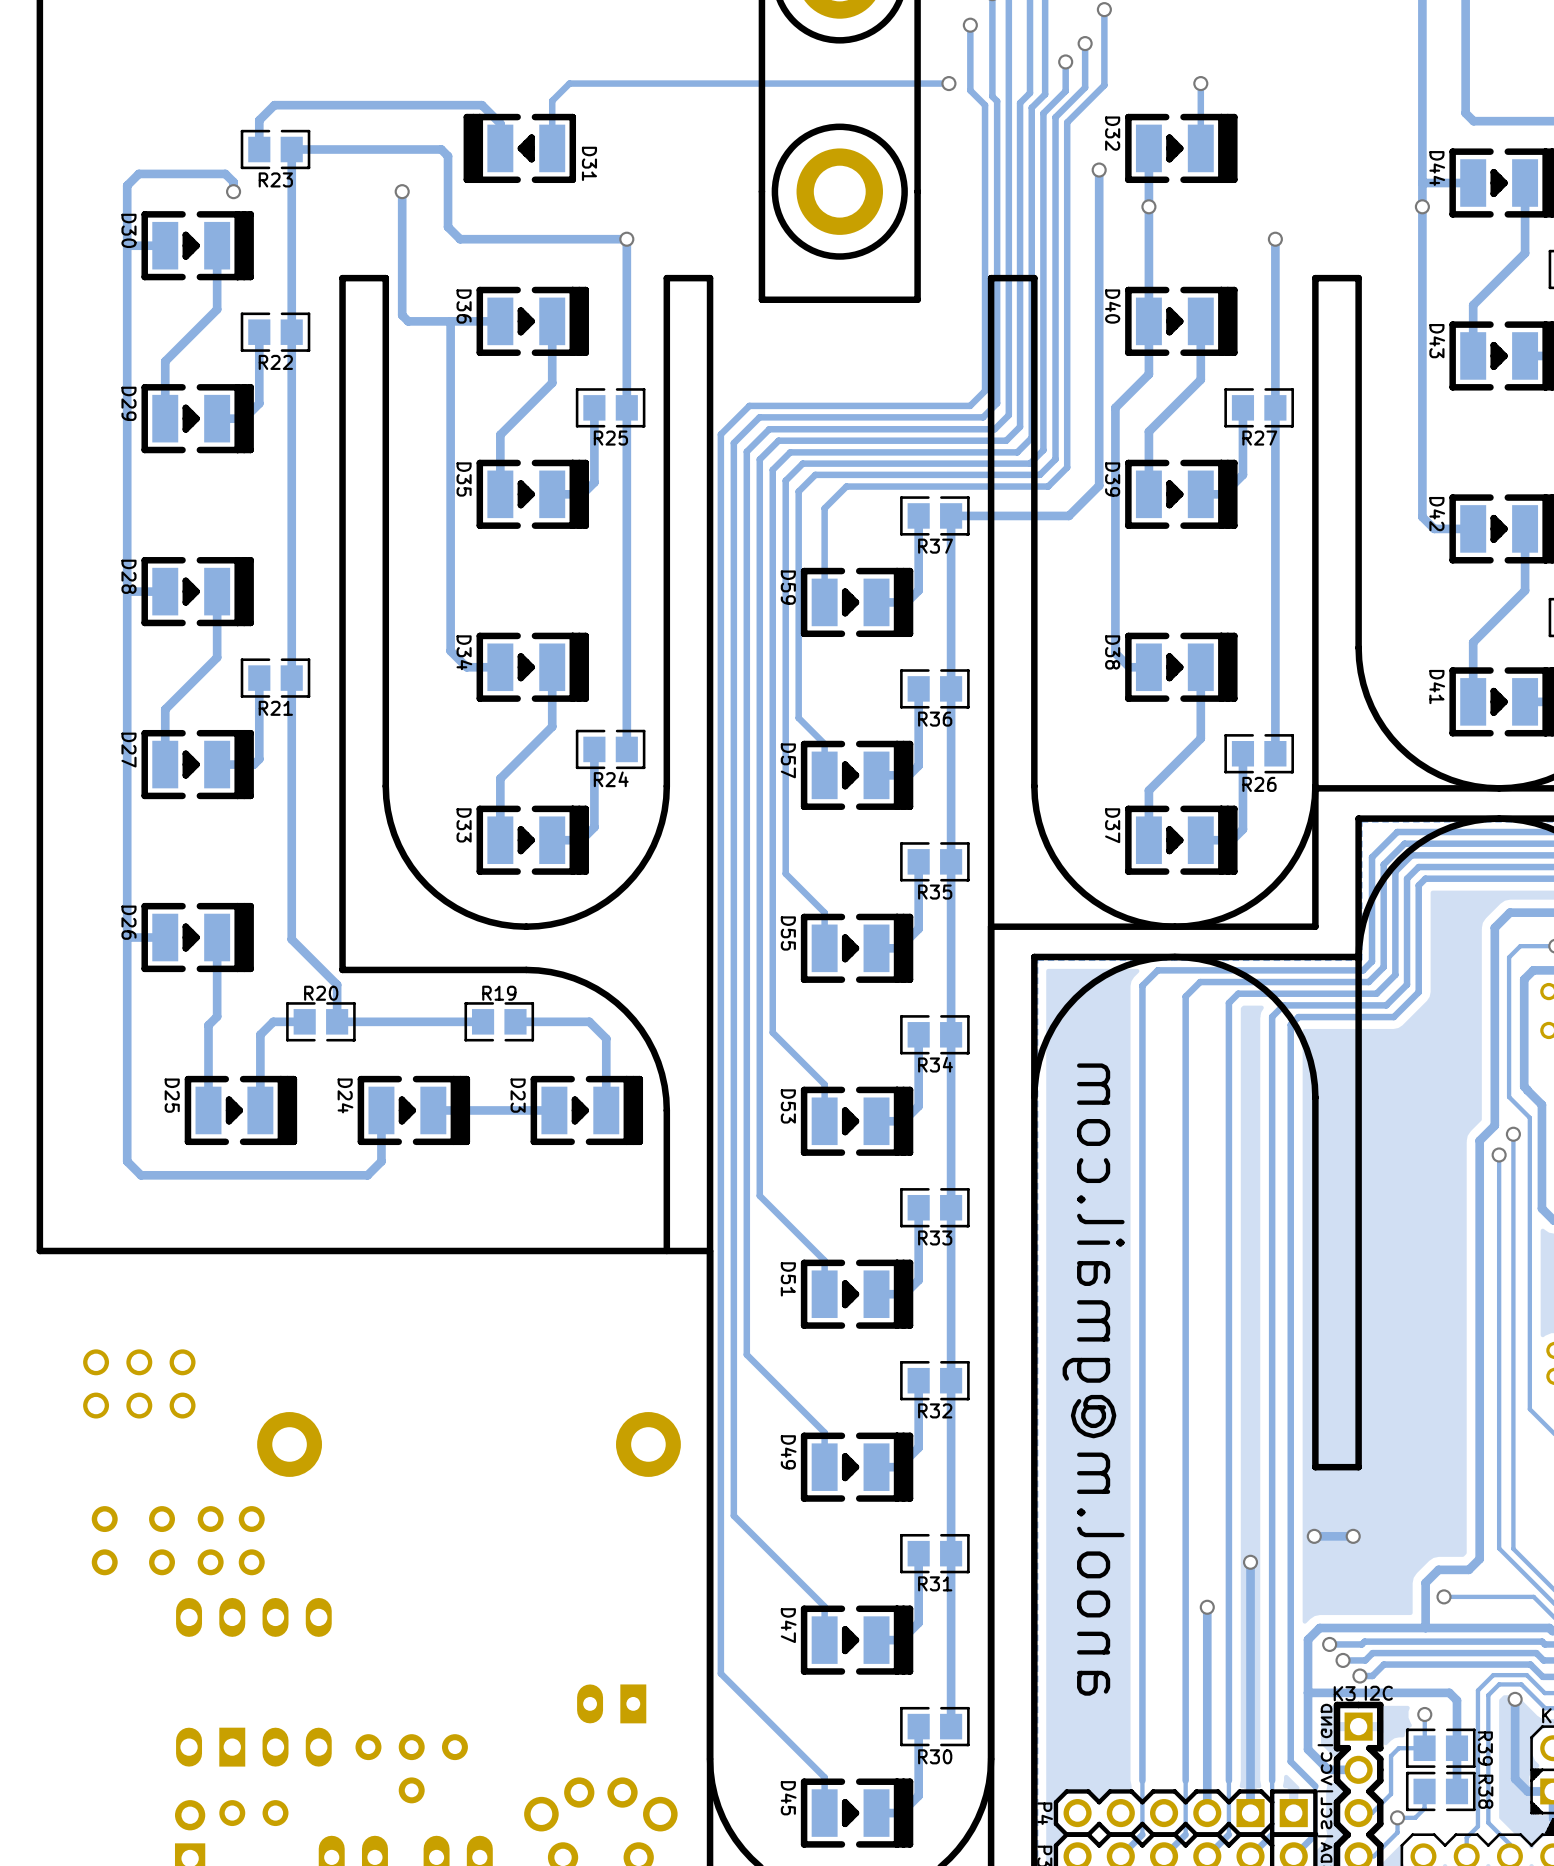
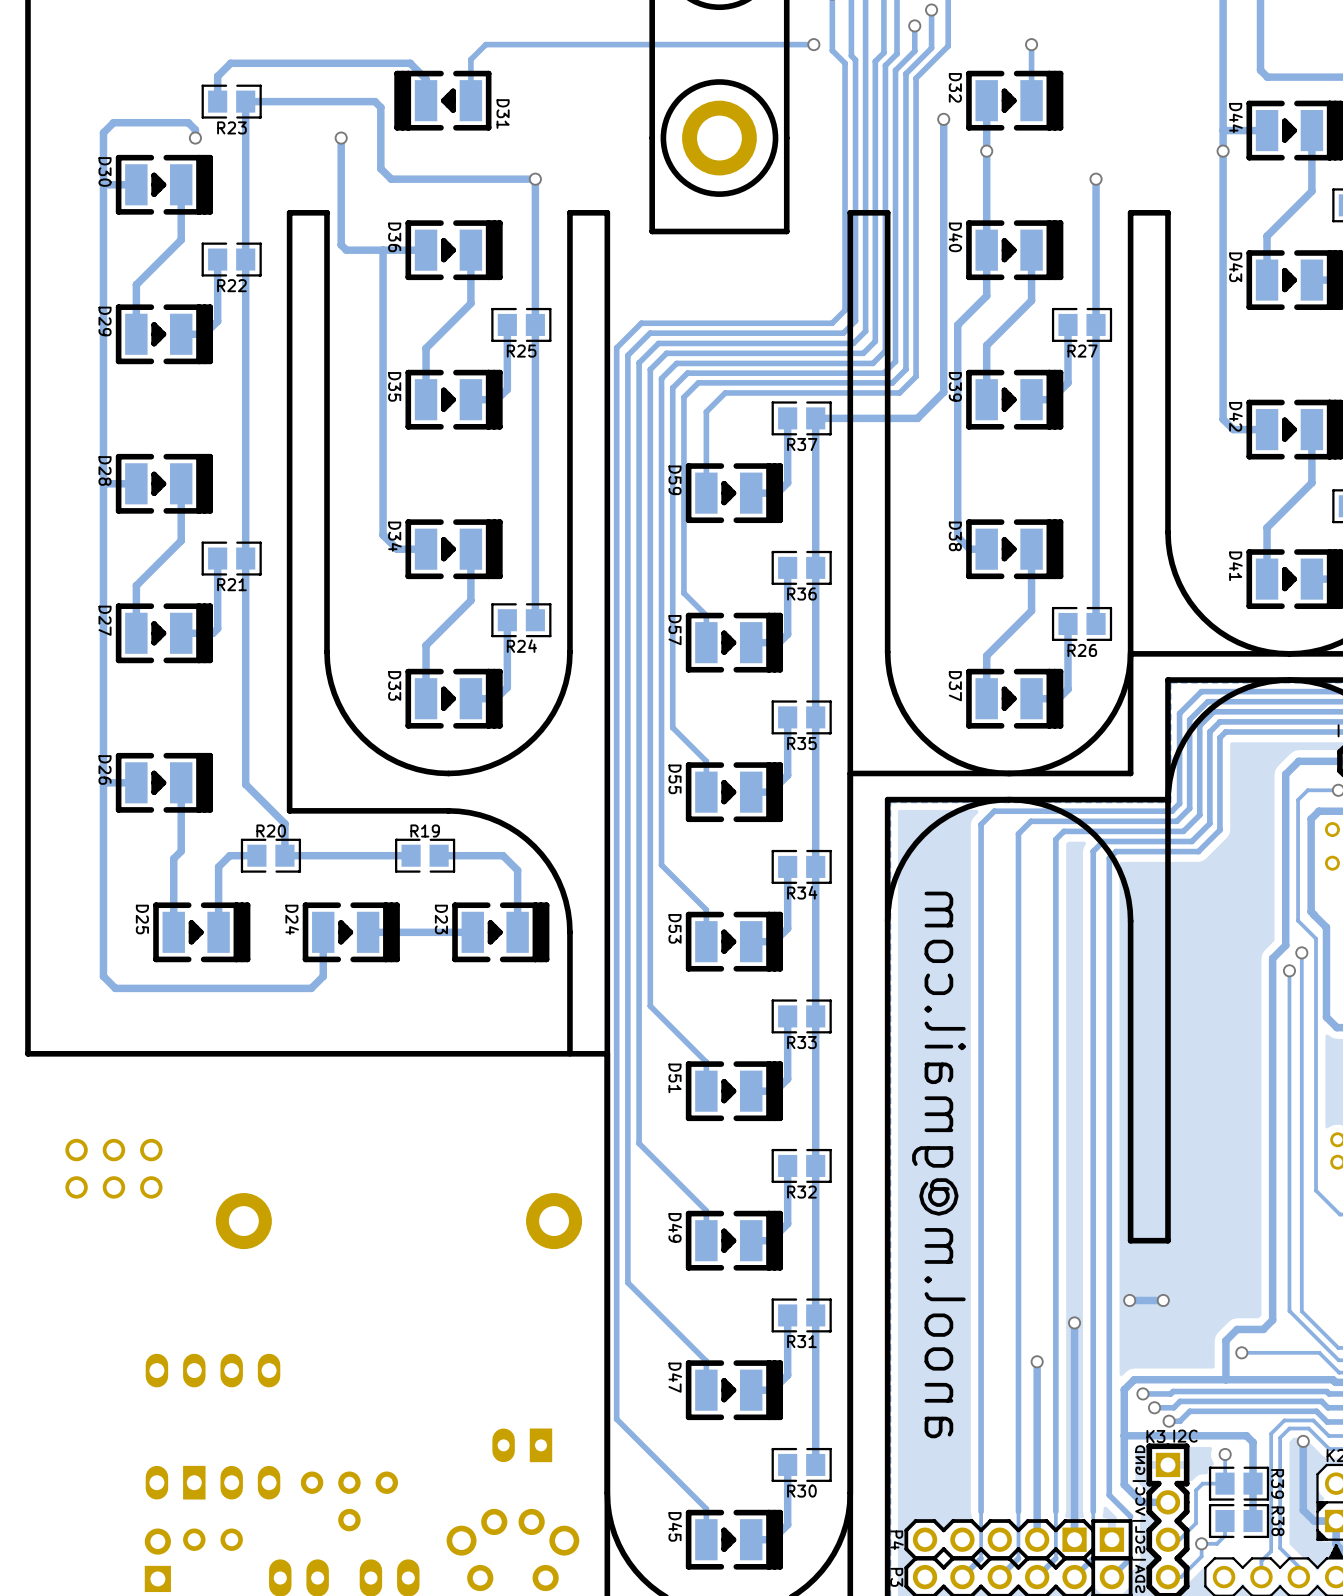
part: (104, 1540) -> none
part: (162, 1540) -> none
part: (210, 1540) -> none
part: (251, 1540) -> none

